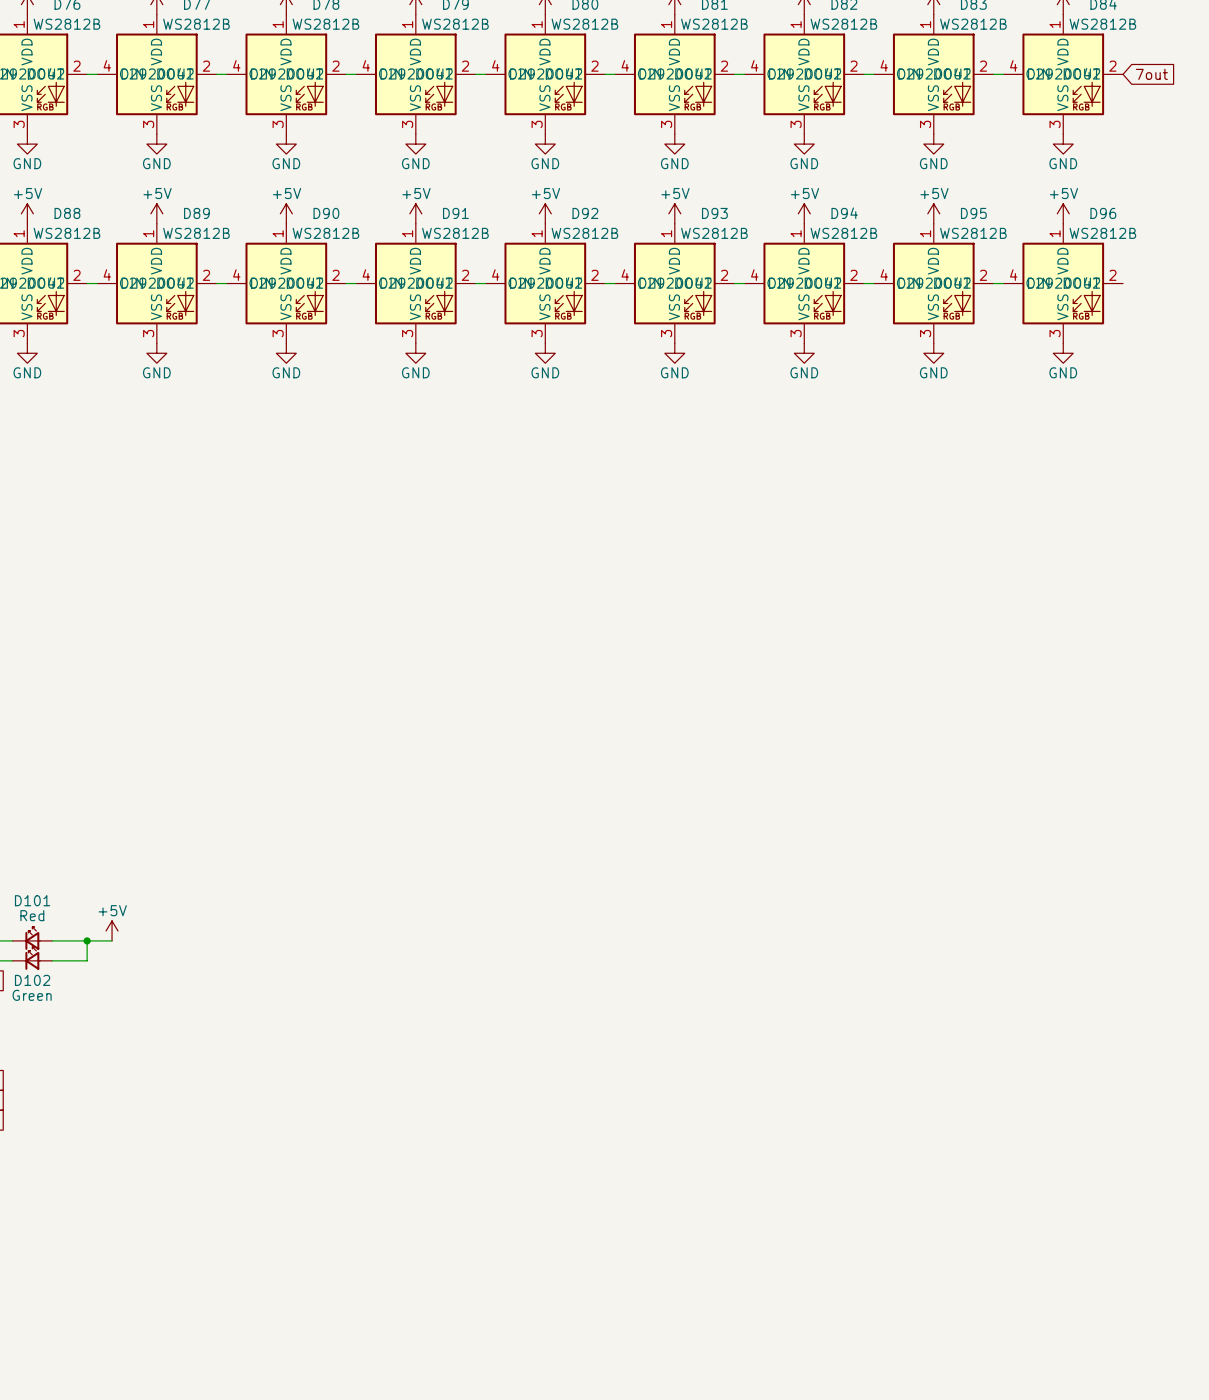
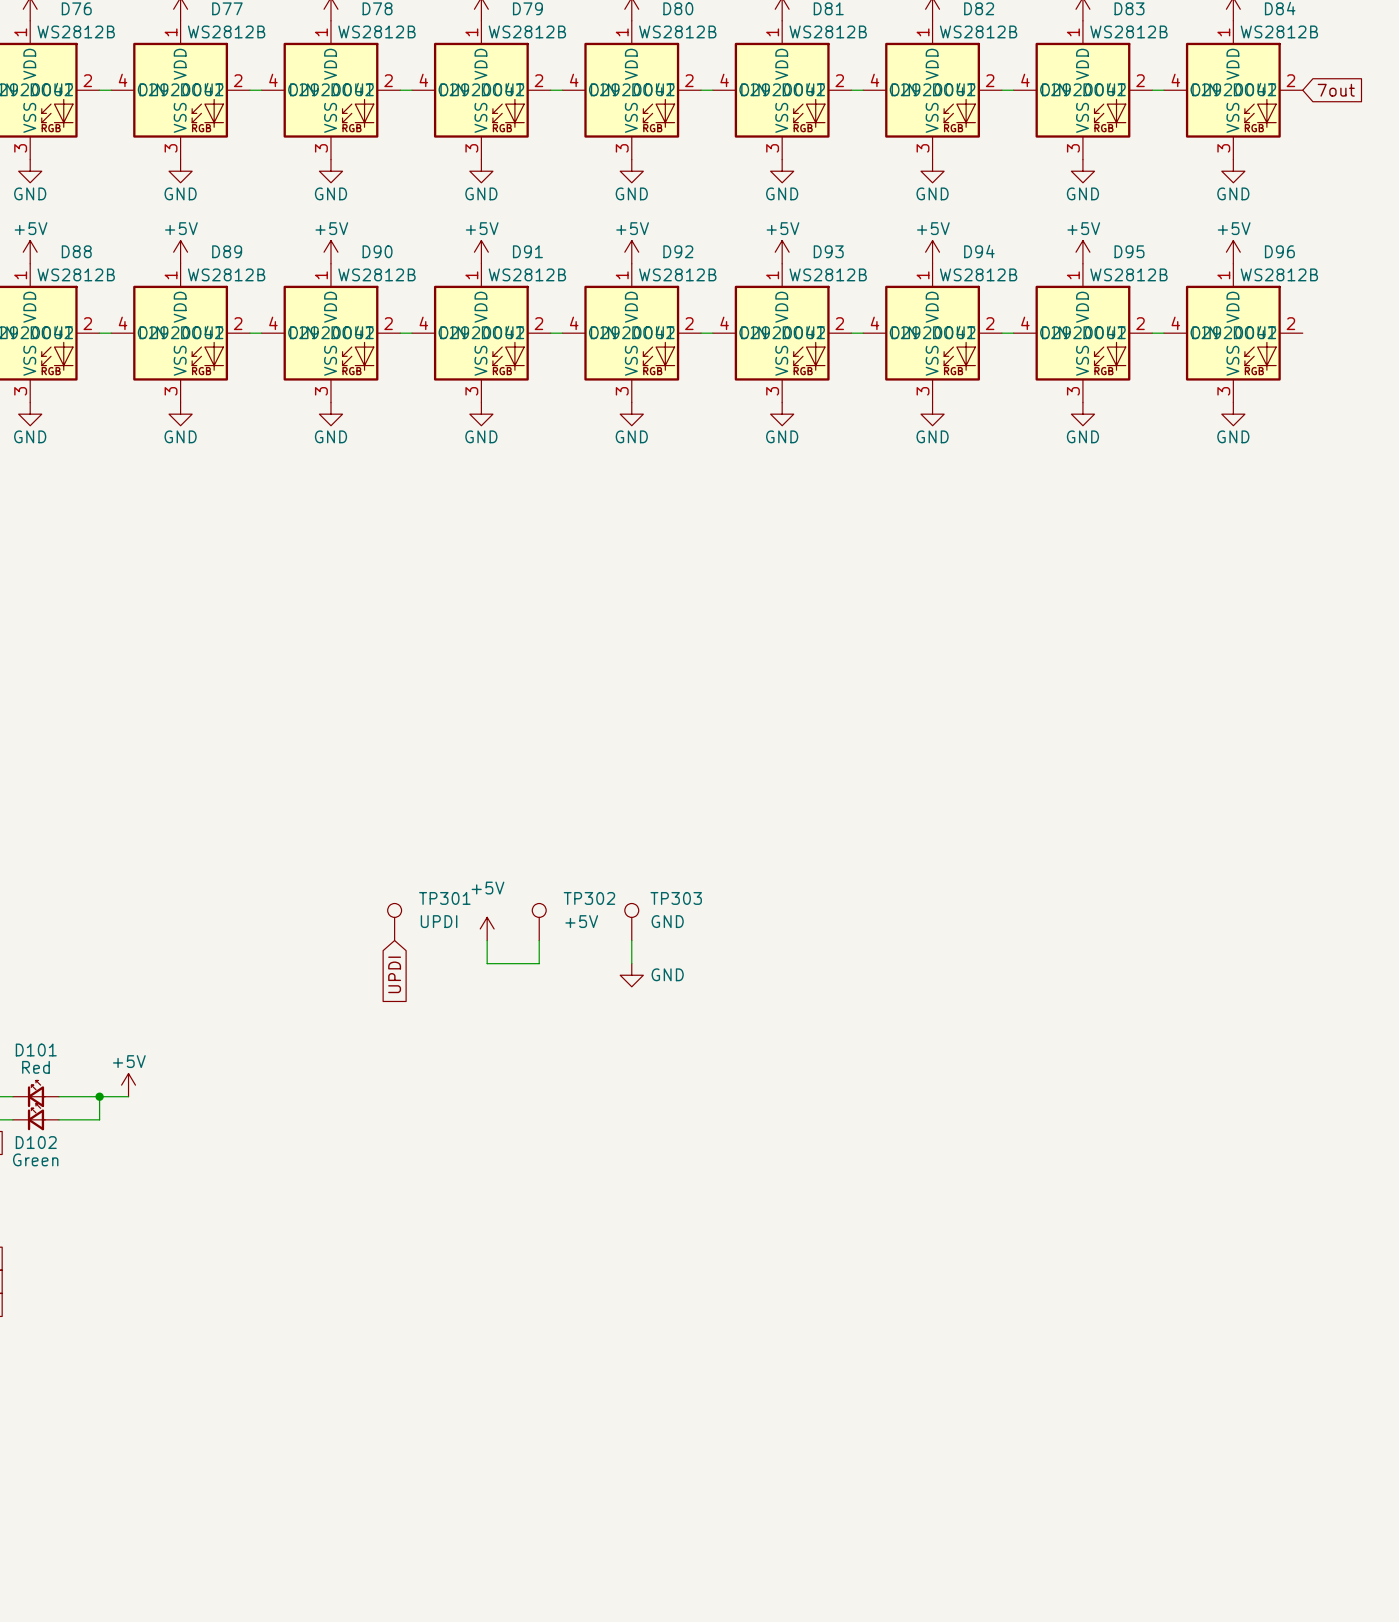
TP301: none -> UPDI (394, 922)
TP302: none -> +5V (539, 922)
TP303: none -> GND (631, 922)
power symbol: none -> +5V (487, 928)
wire: none -> (487, 940) (487, 963) (539, 963) (539, 940)
wire: none -> (631, 940) (631, 963)
global label: none -> UPDI (394, 974)
power symbol: none -> GND (631, 975)

